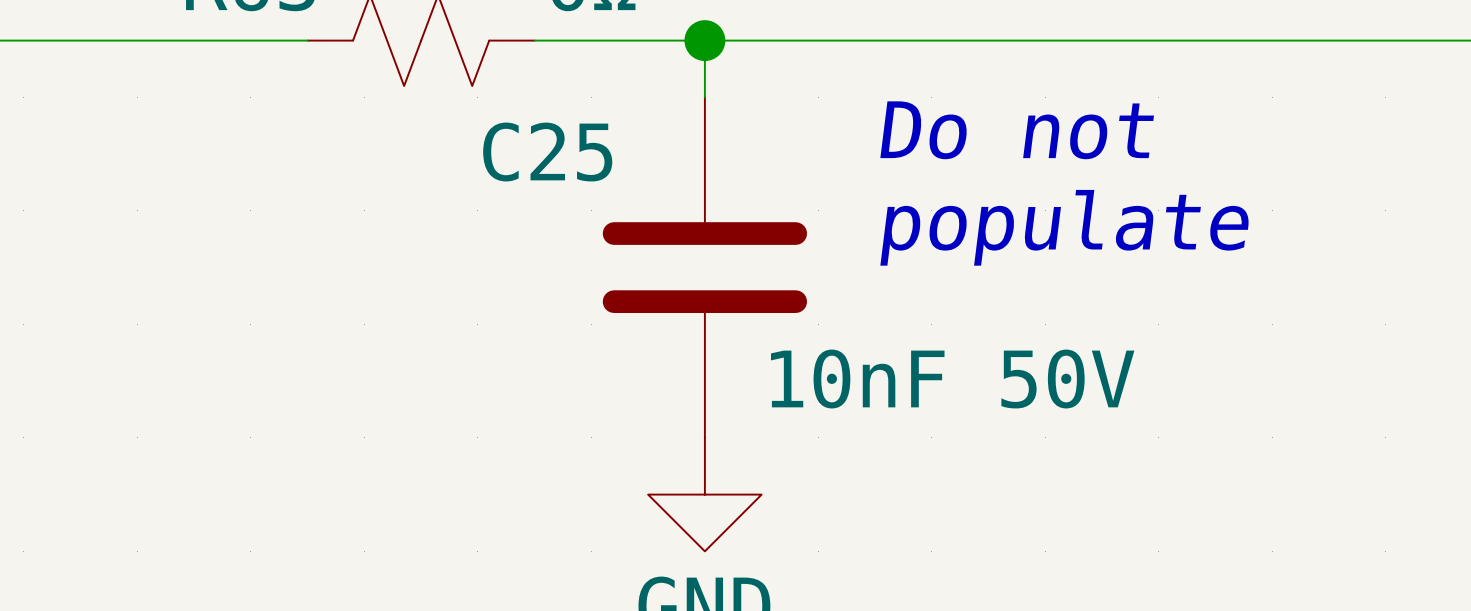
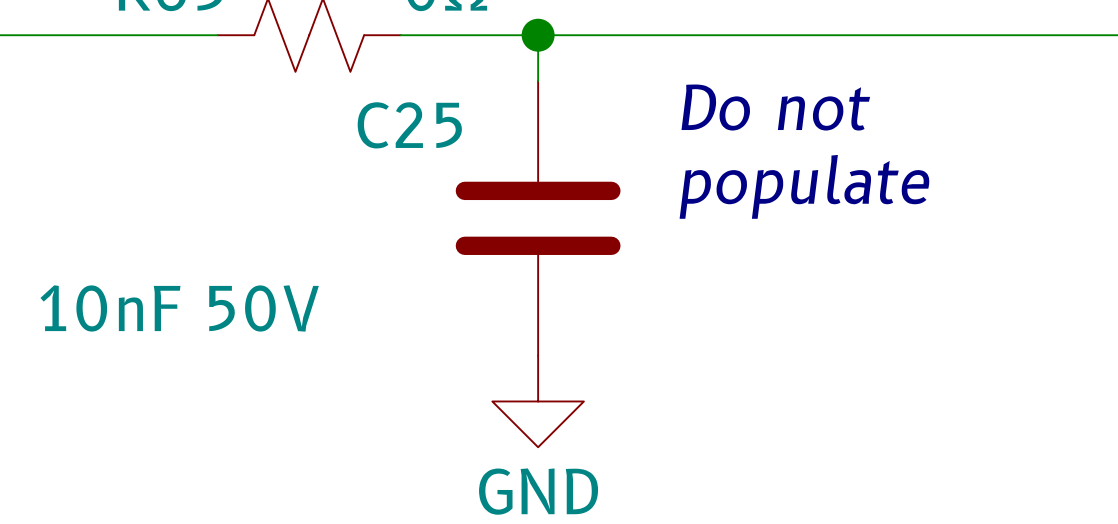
C25 value position: 10nF 50V (952, 379) -> 10nF 50V (179, 308)

